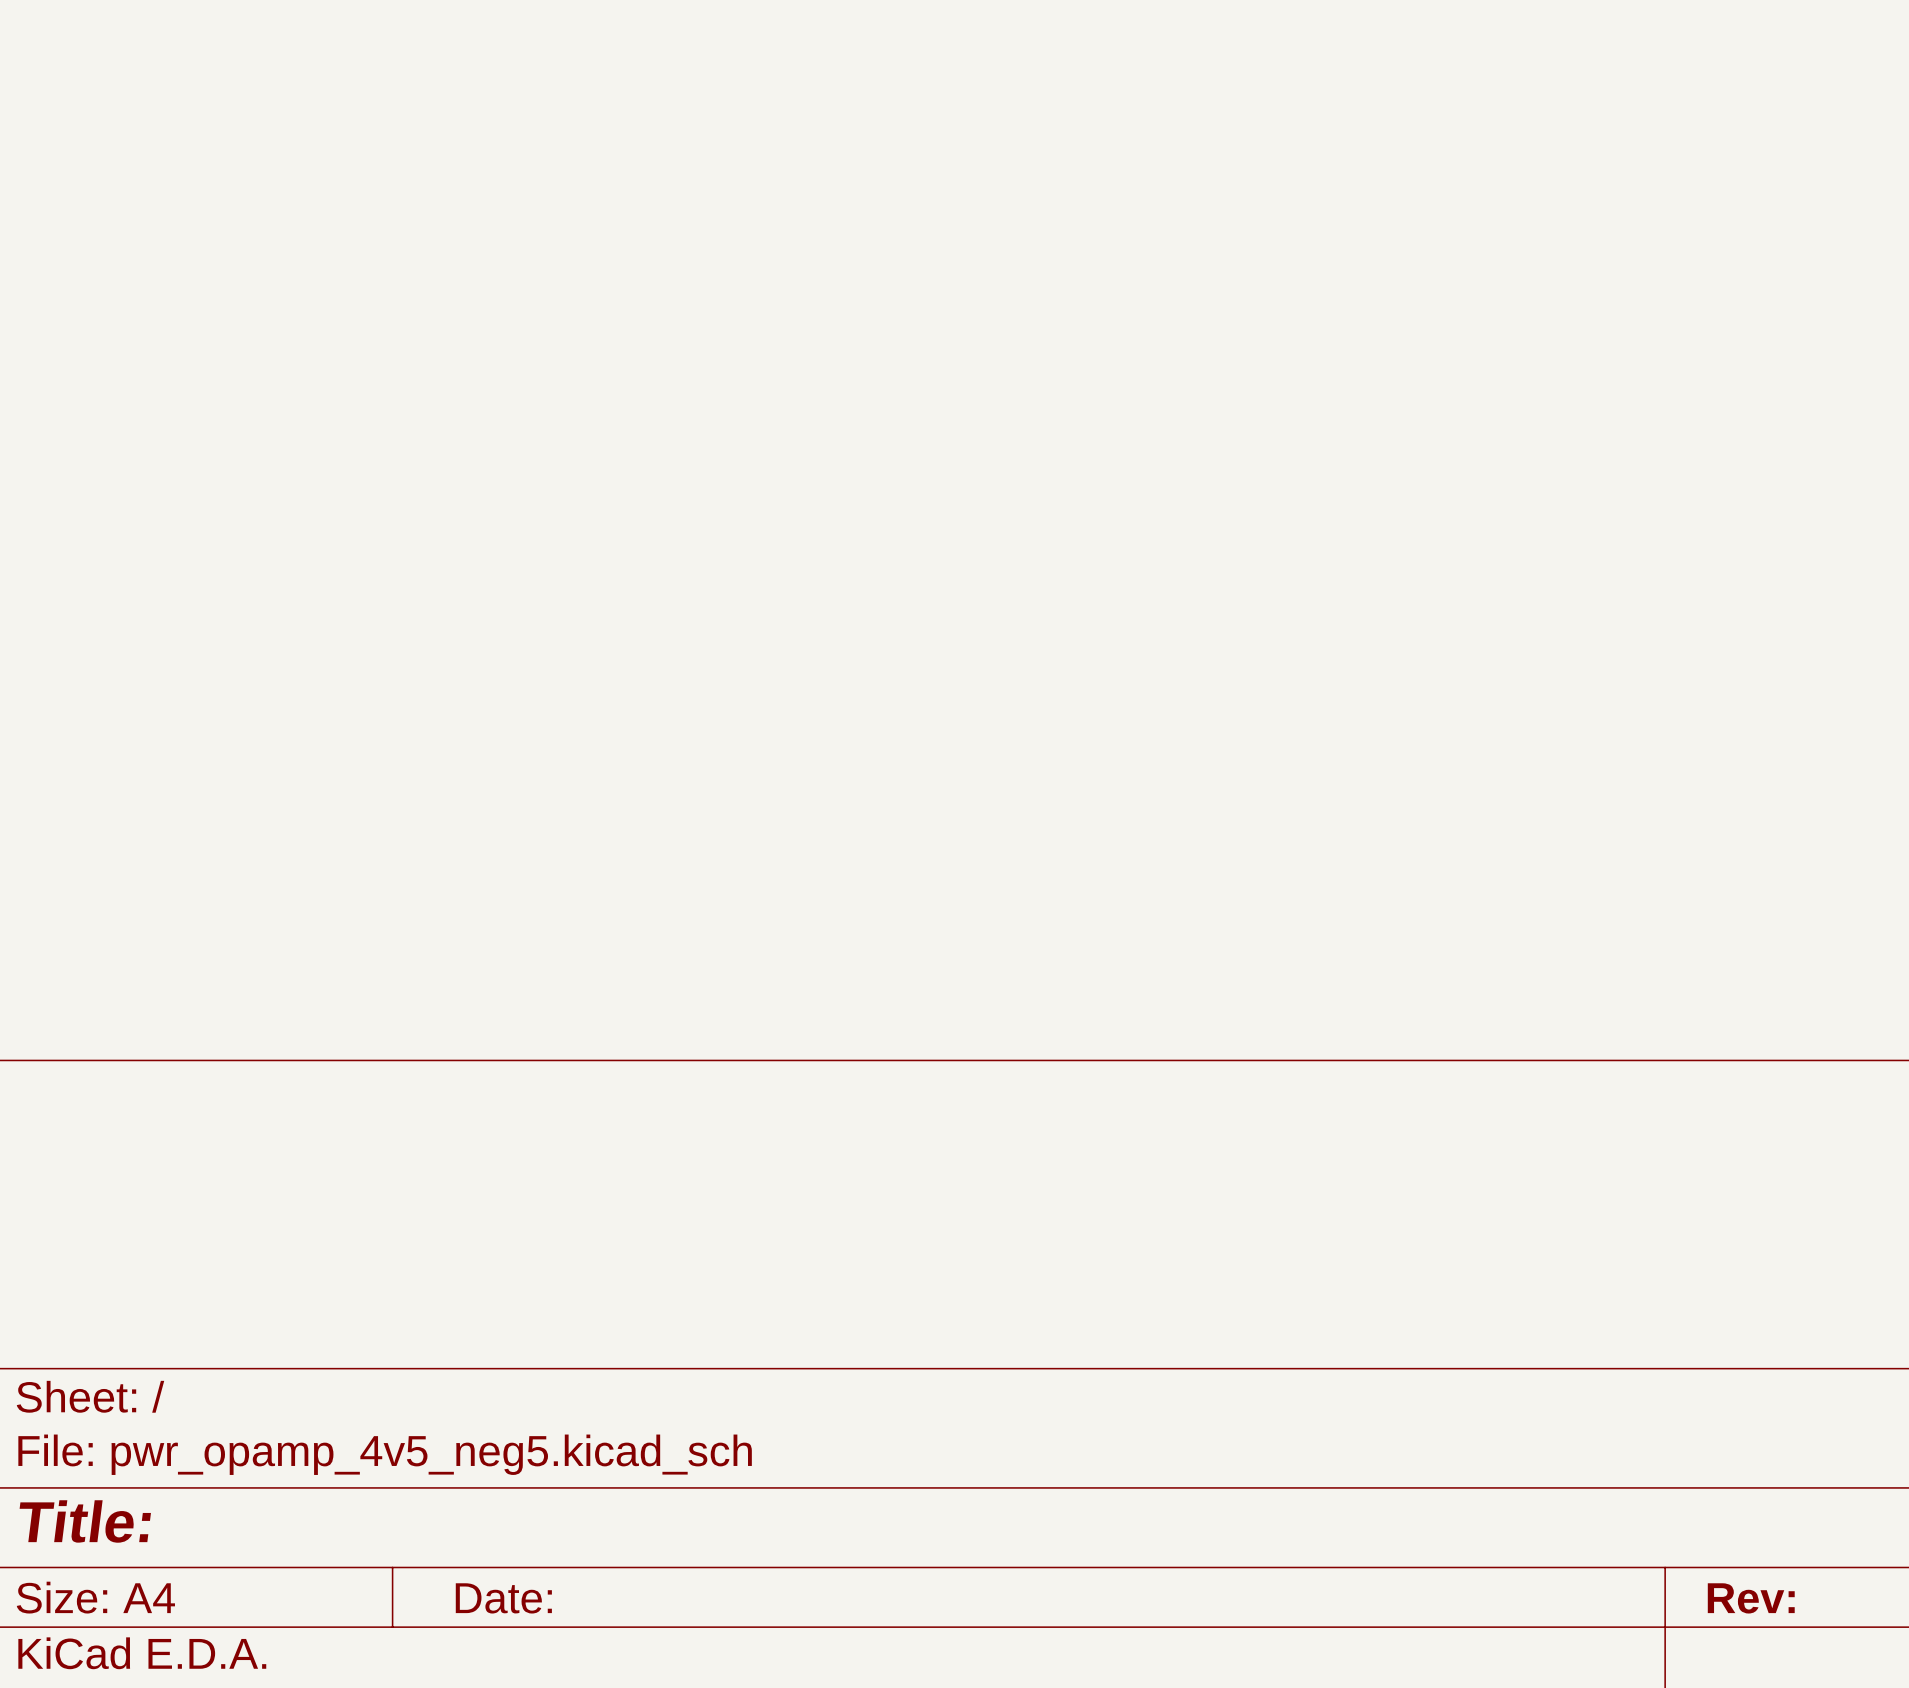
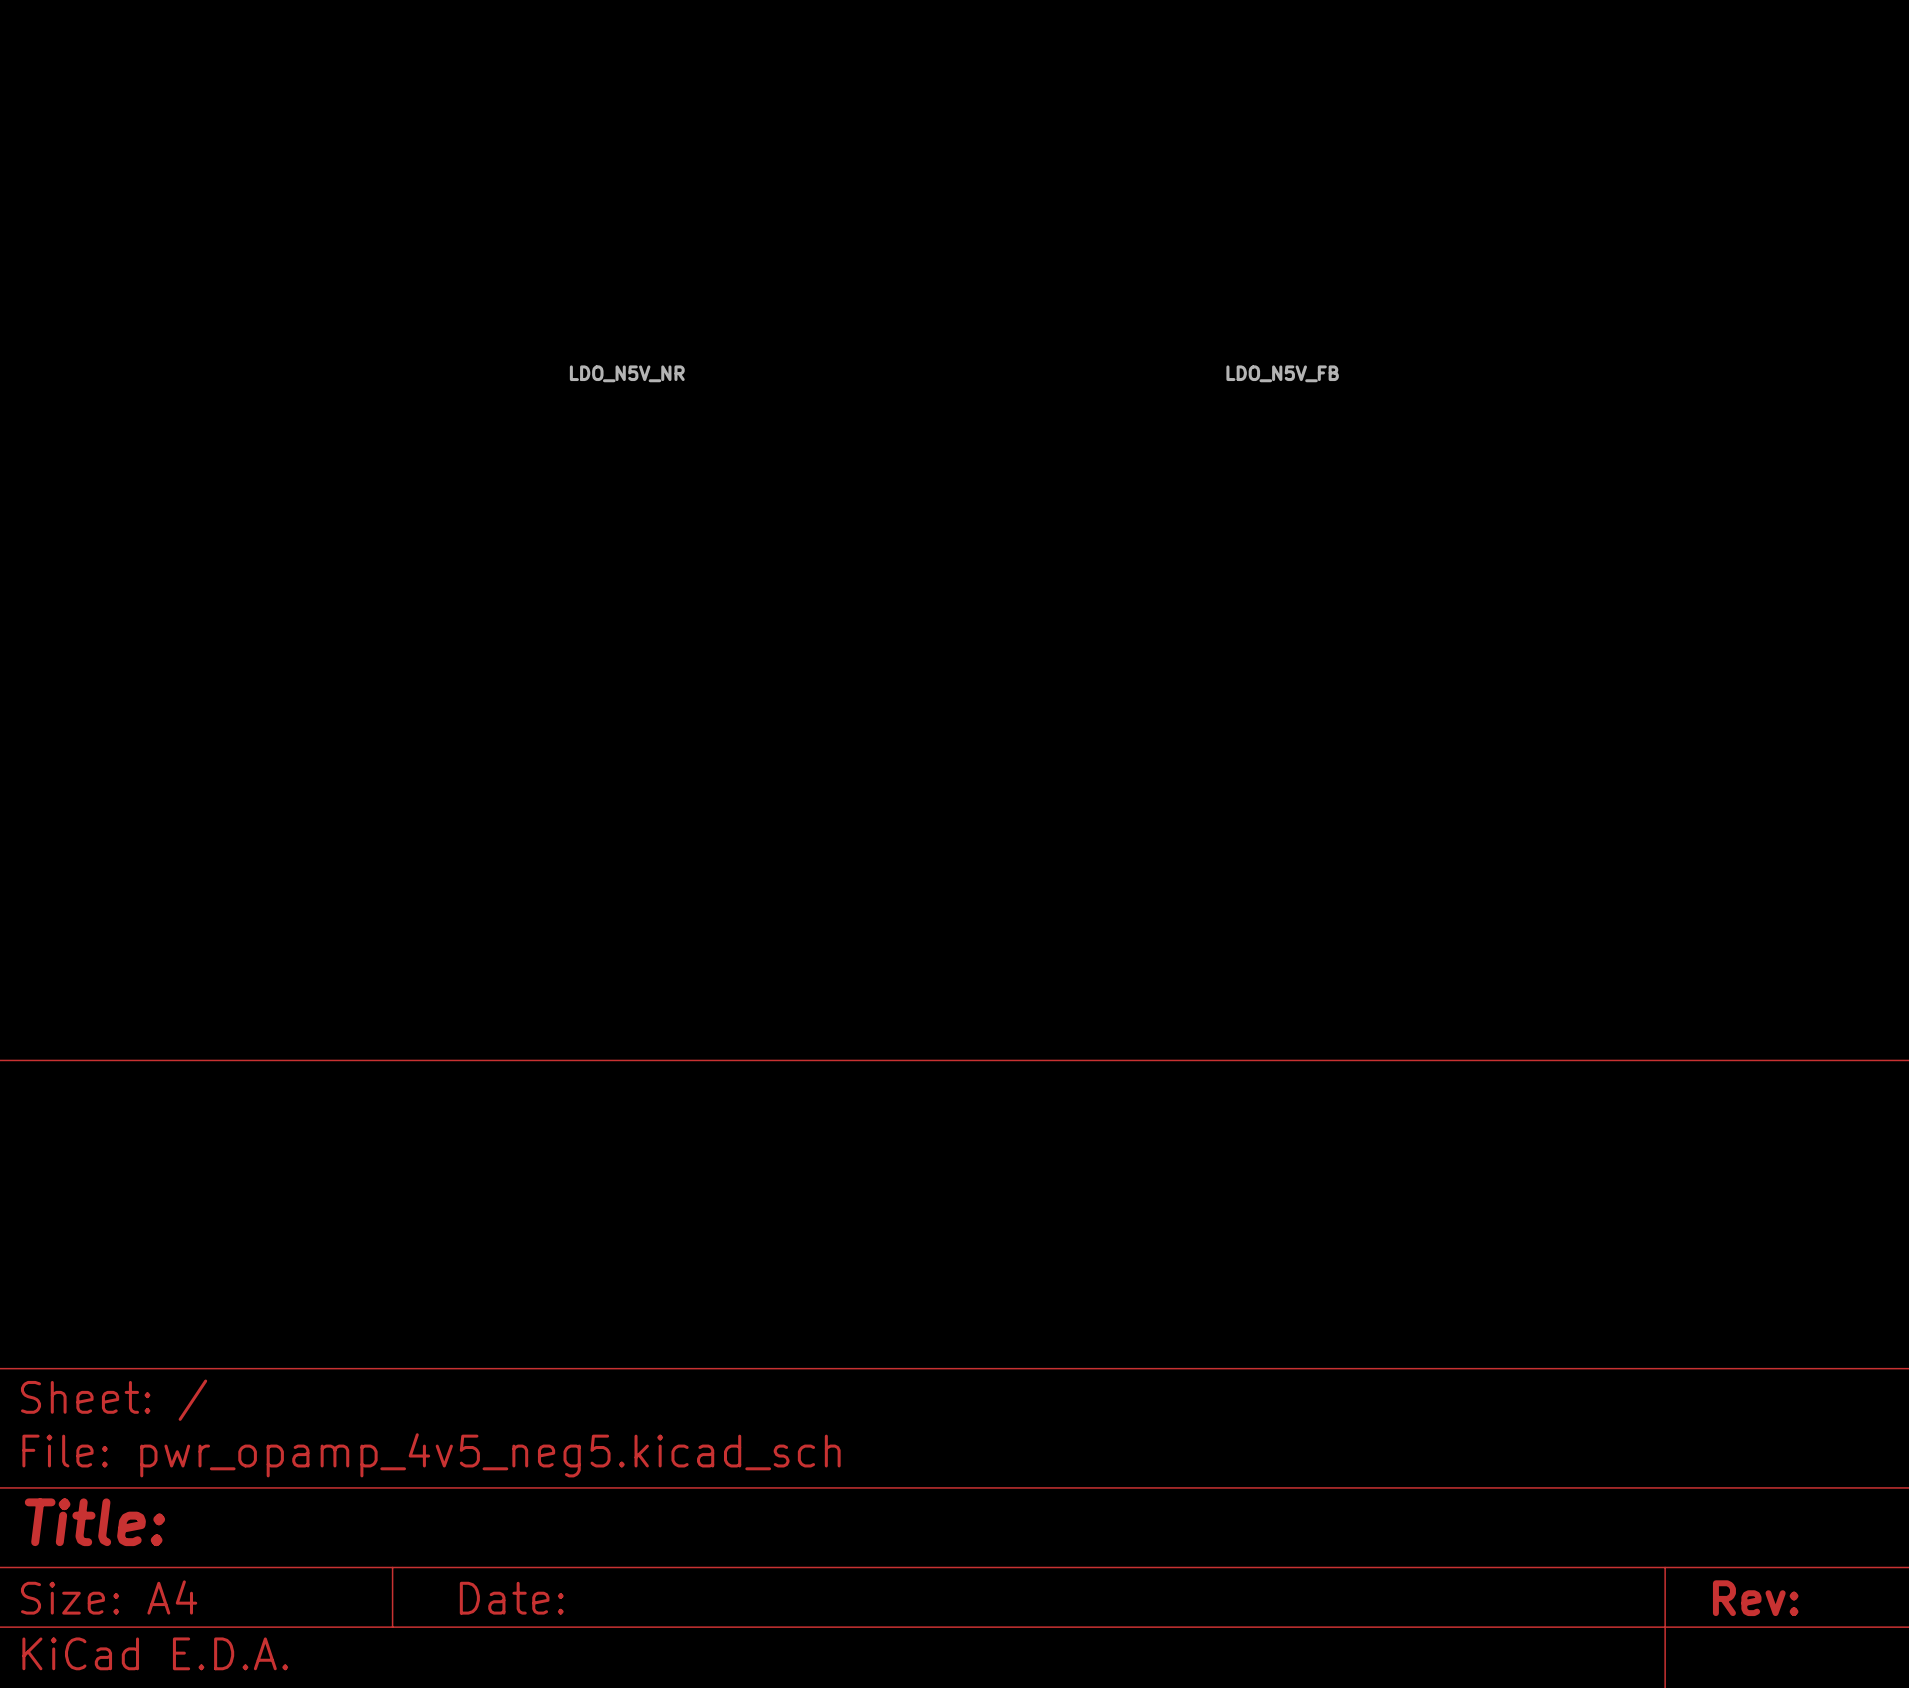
label: none -> LDO_N5V_NR (627, 373)
label: none -> LDO_N5V_FB (1282, 373)

